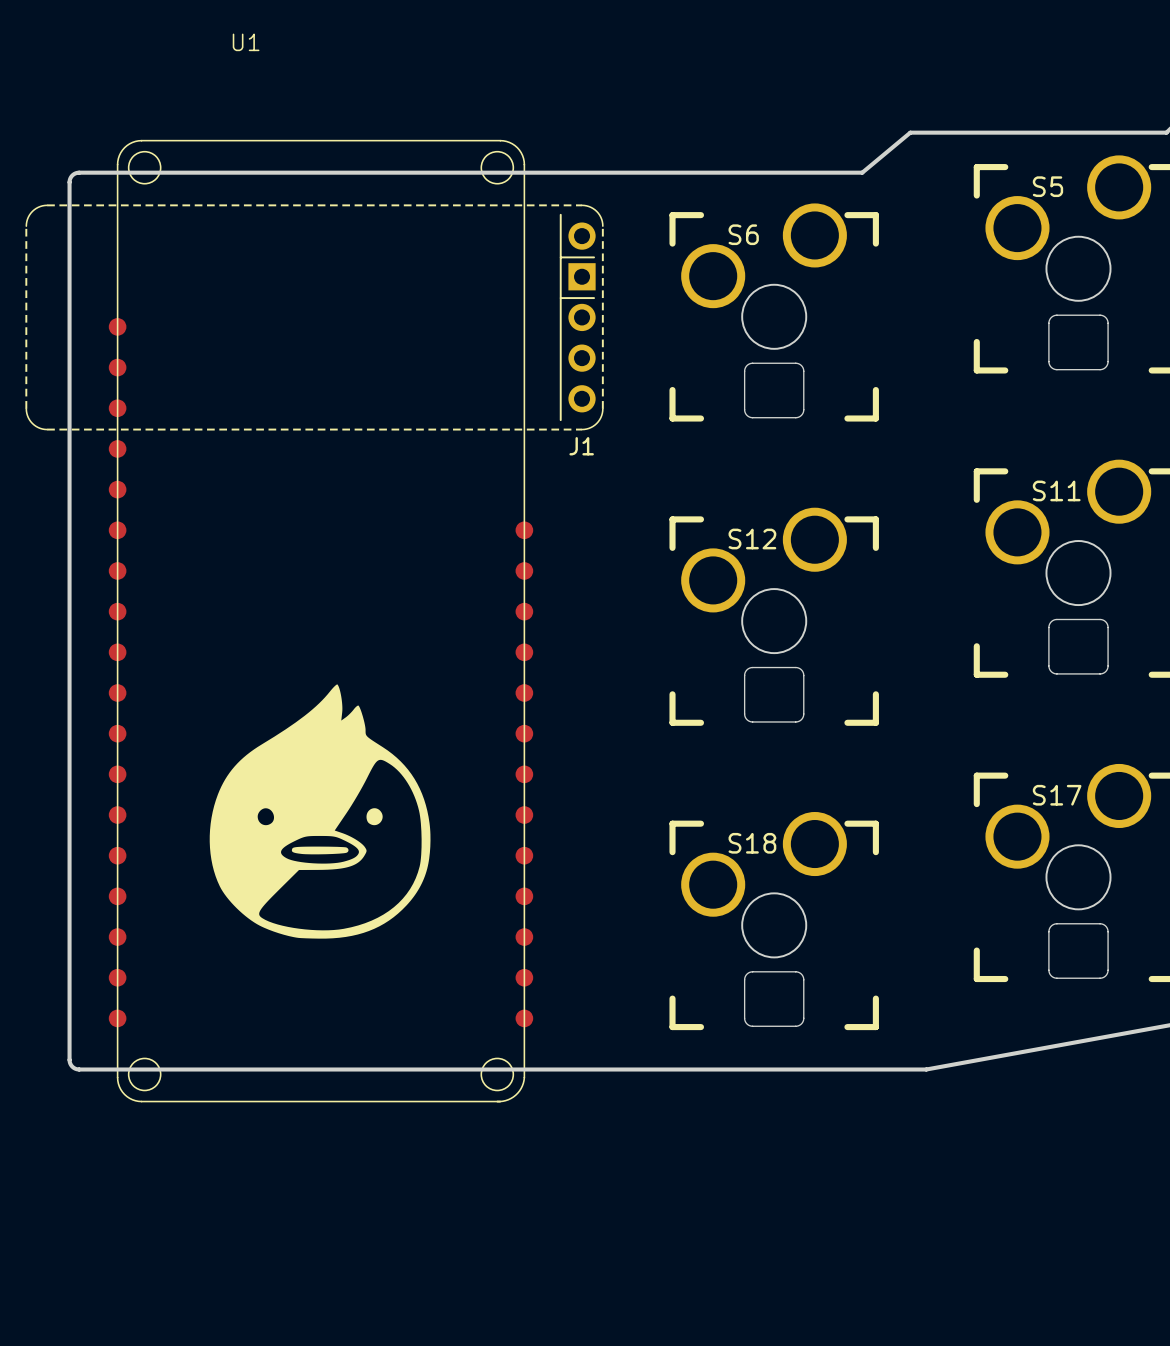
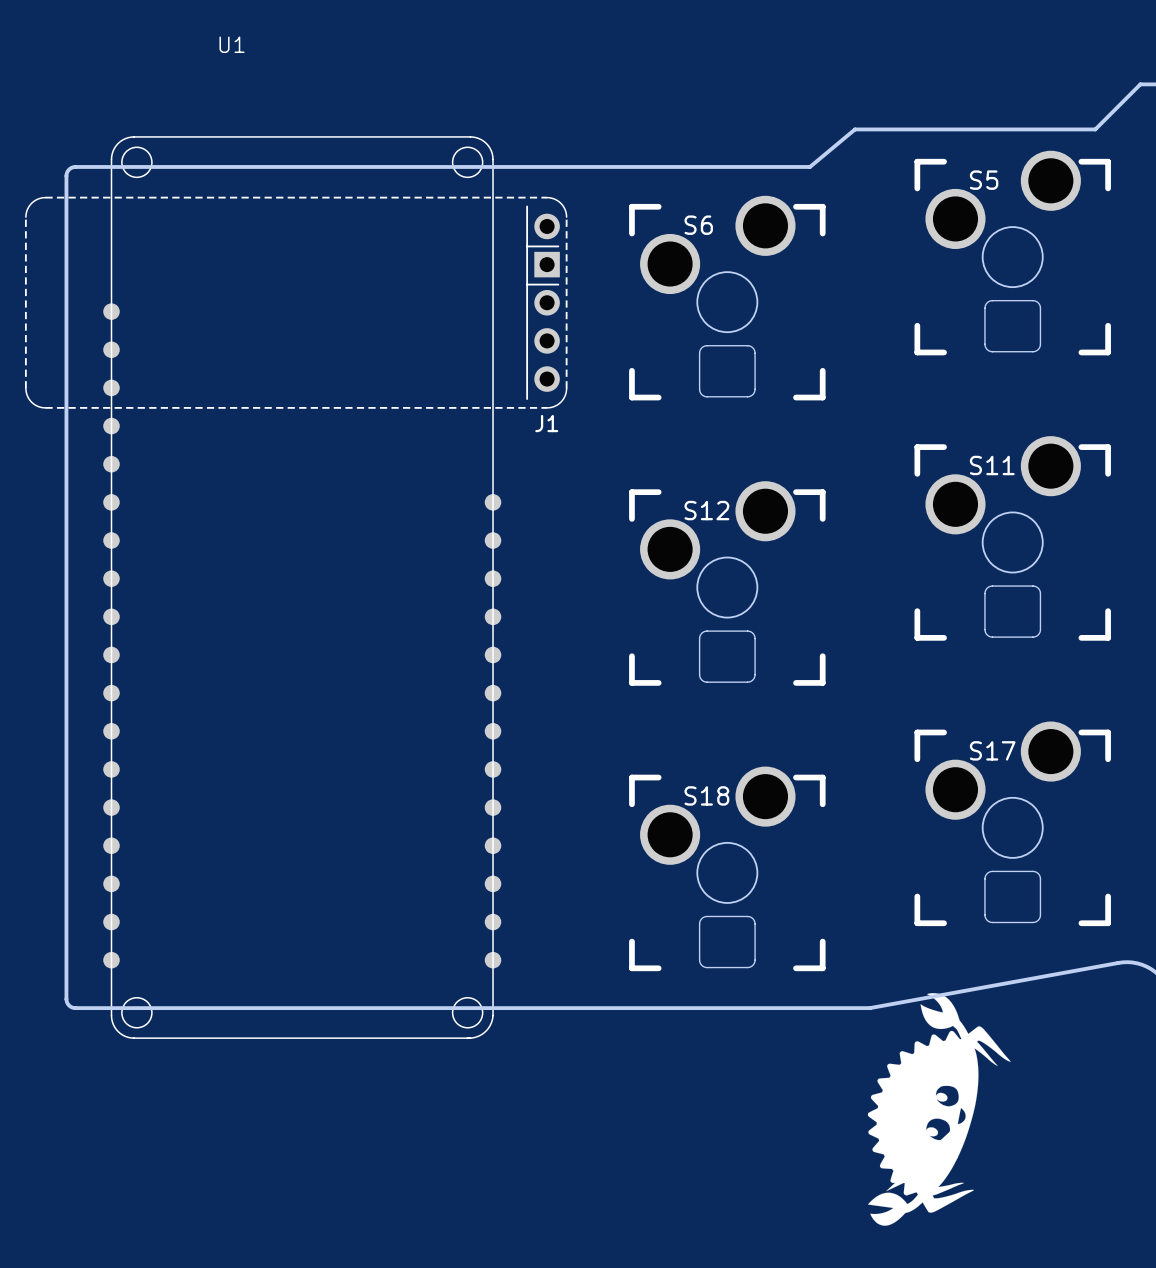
drawing: [209, 684, 431, 939] -> none
drawing: none -> [867, 993, 1011, 1226]

